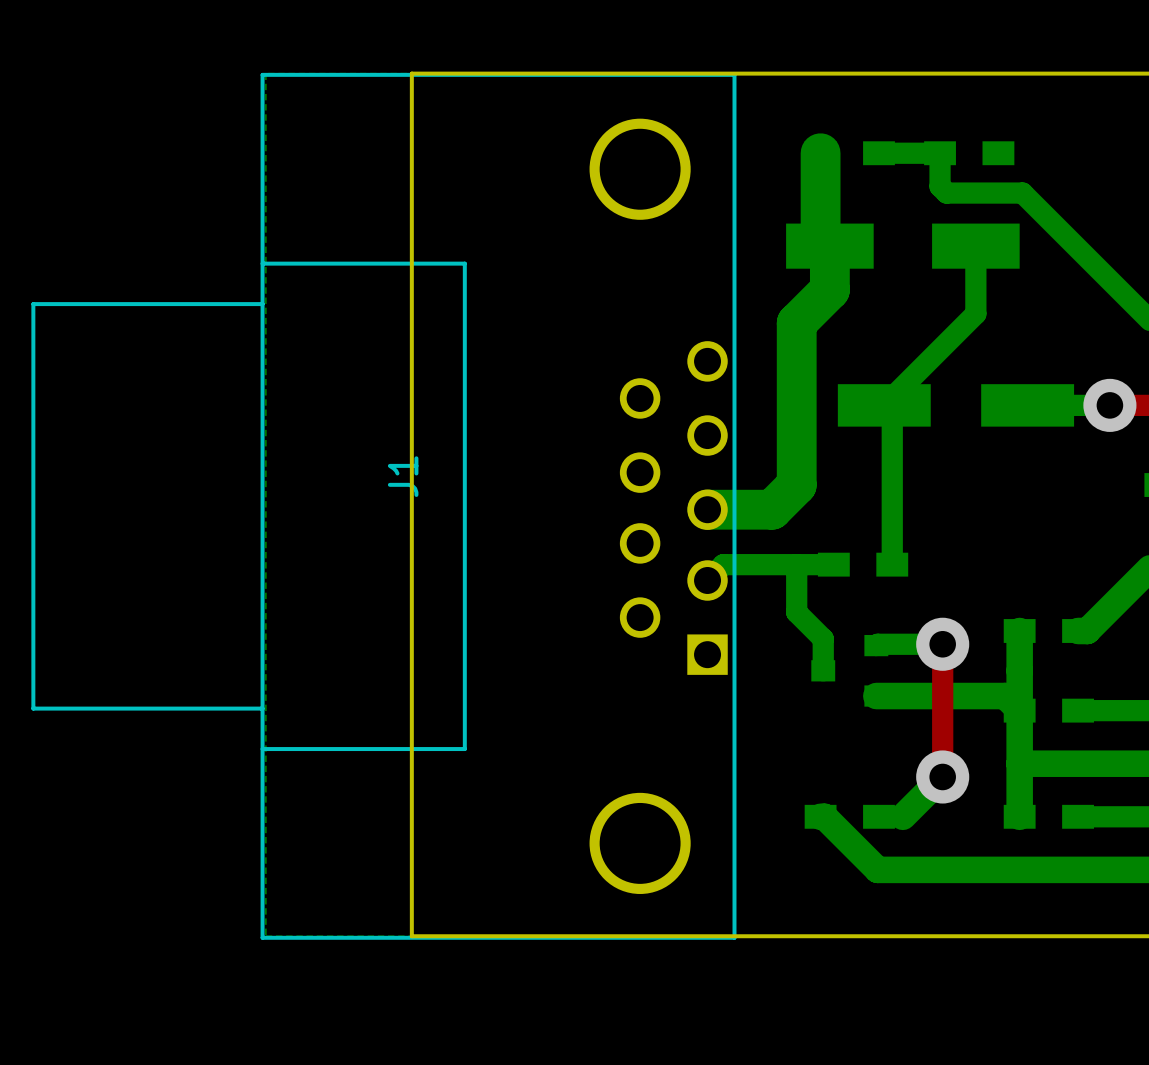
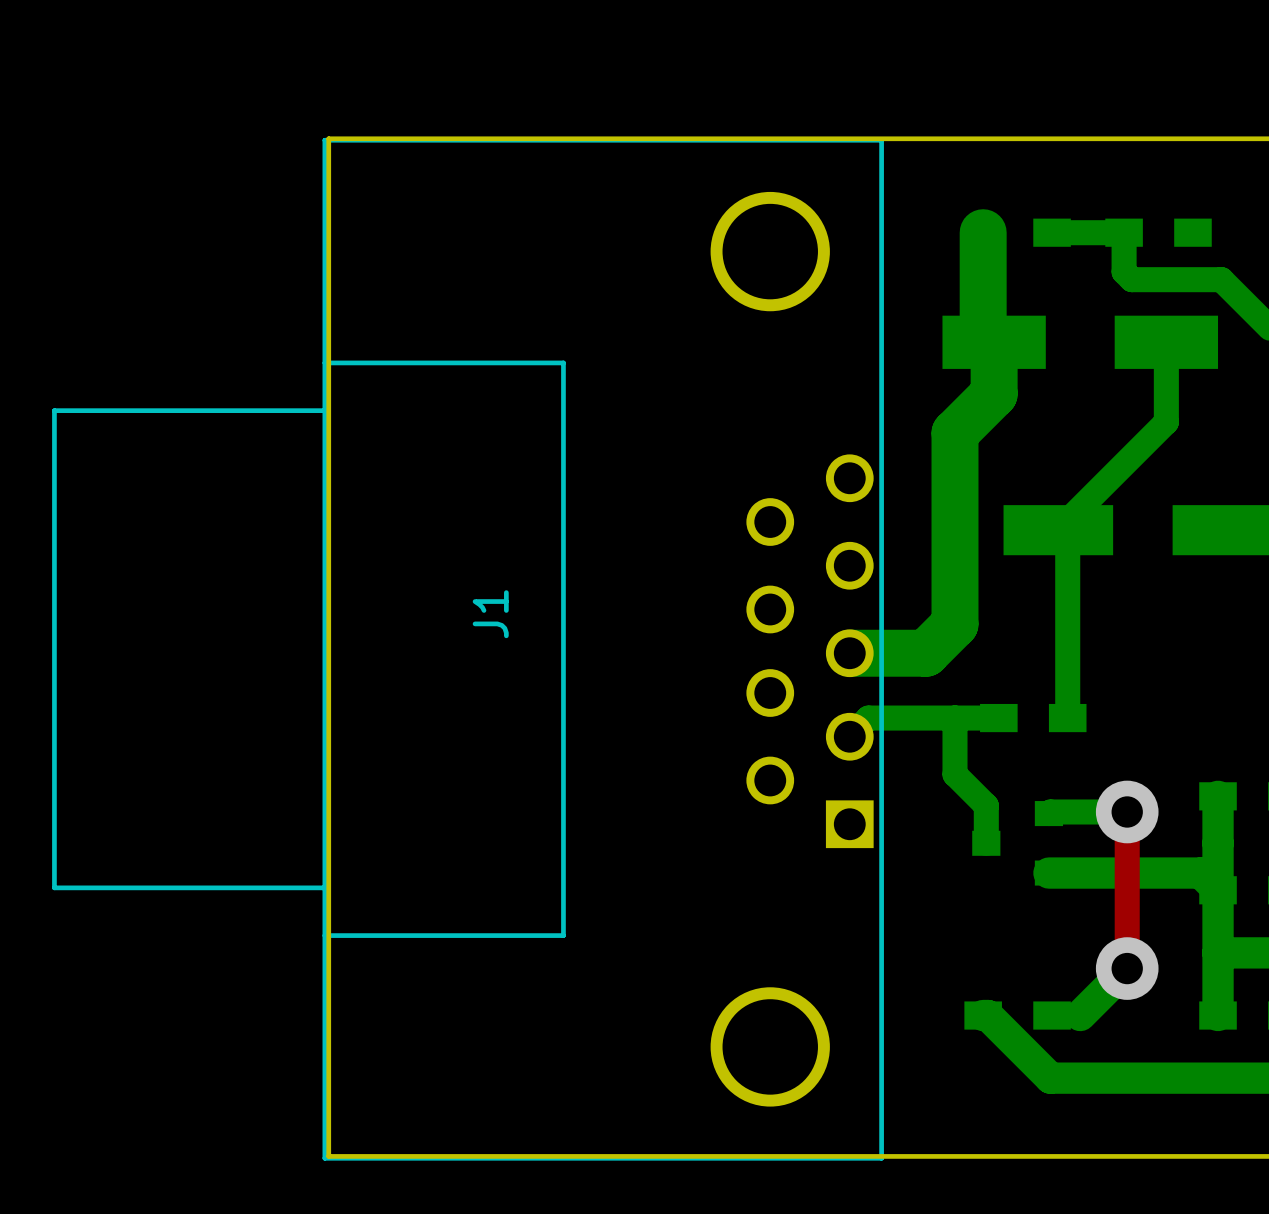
board edge: (411, 73) (411, 936) -> (500, 138) (328, 138) (328, 1156) (500, 1156)

